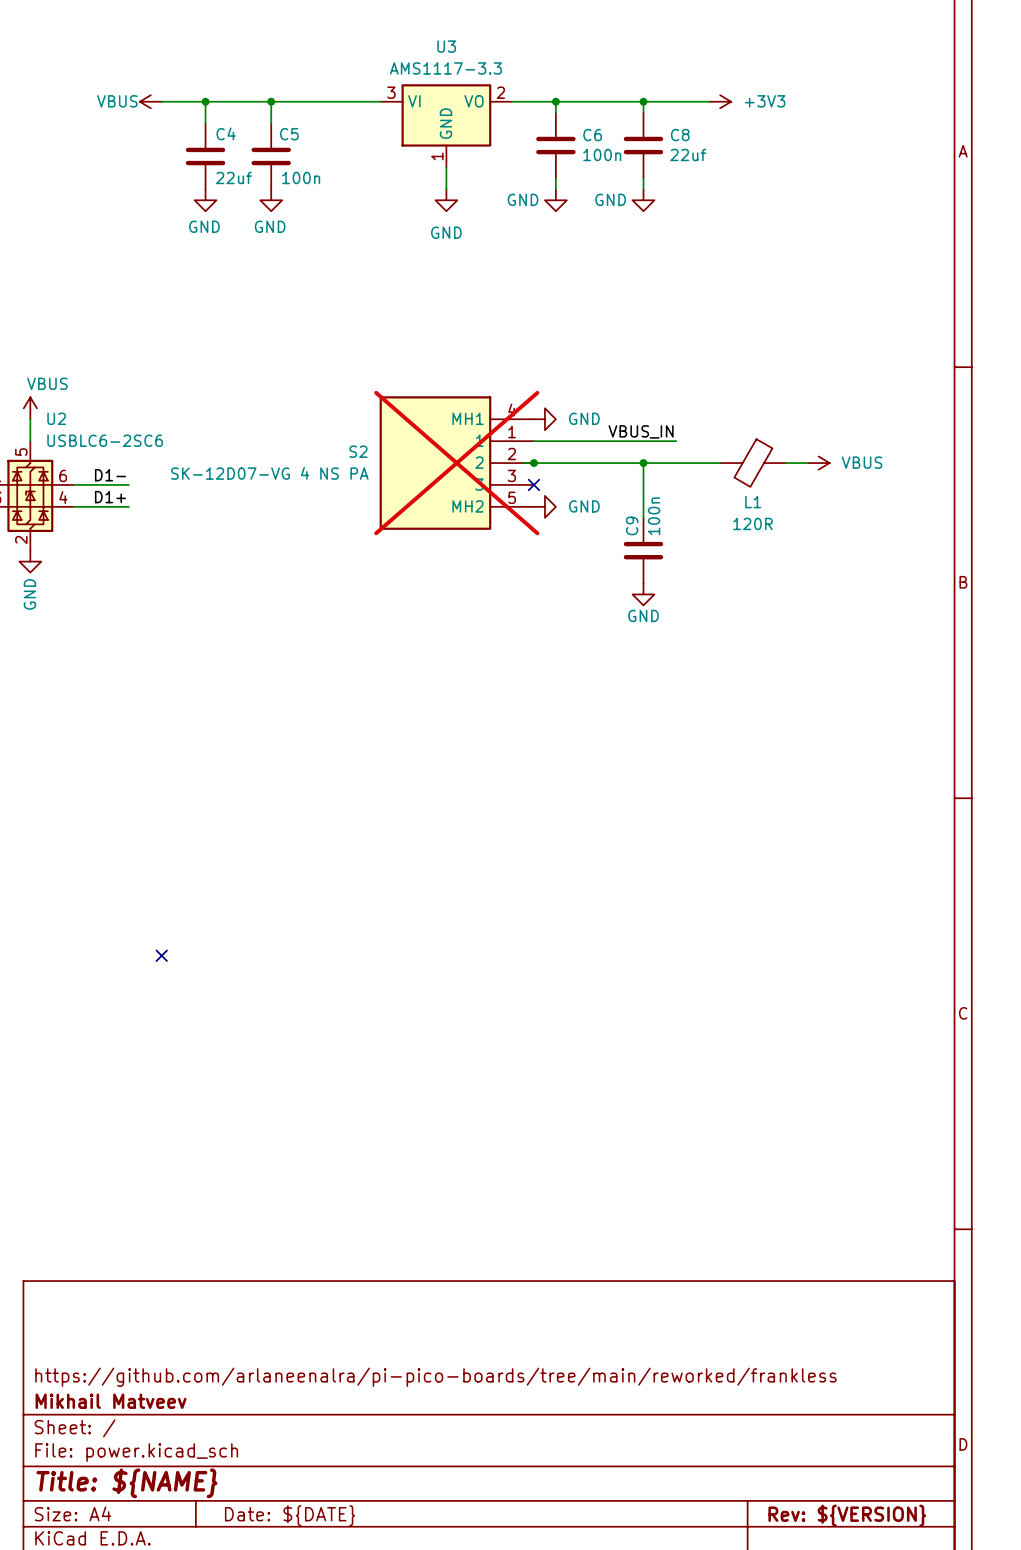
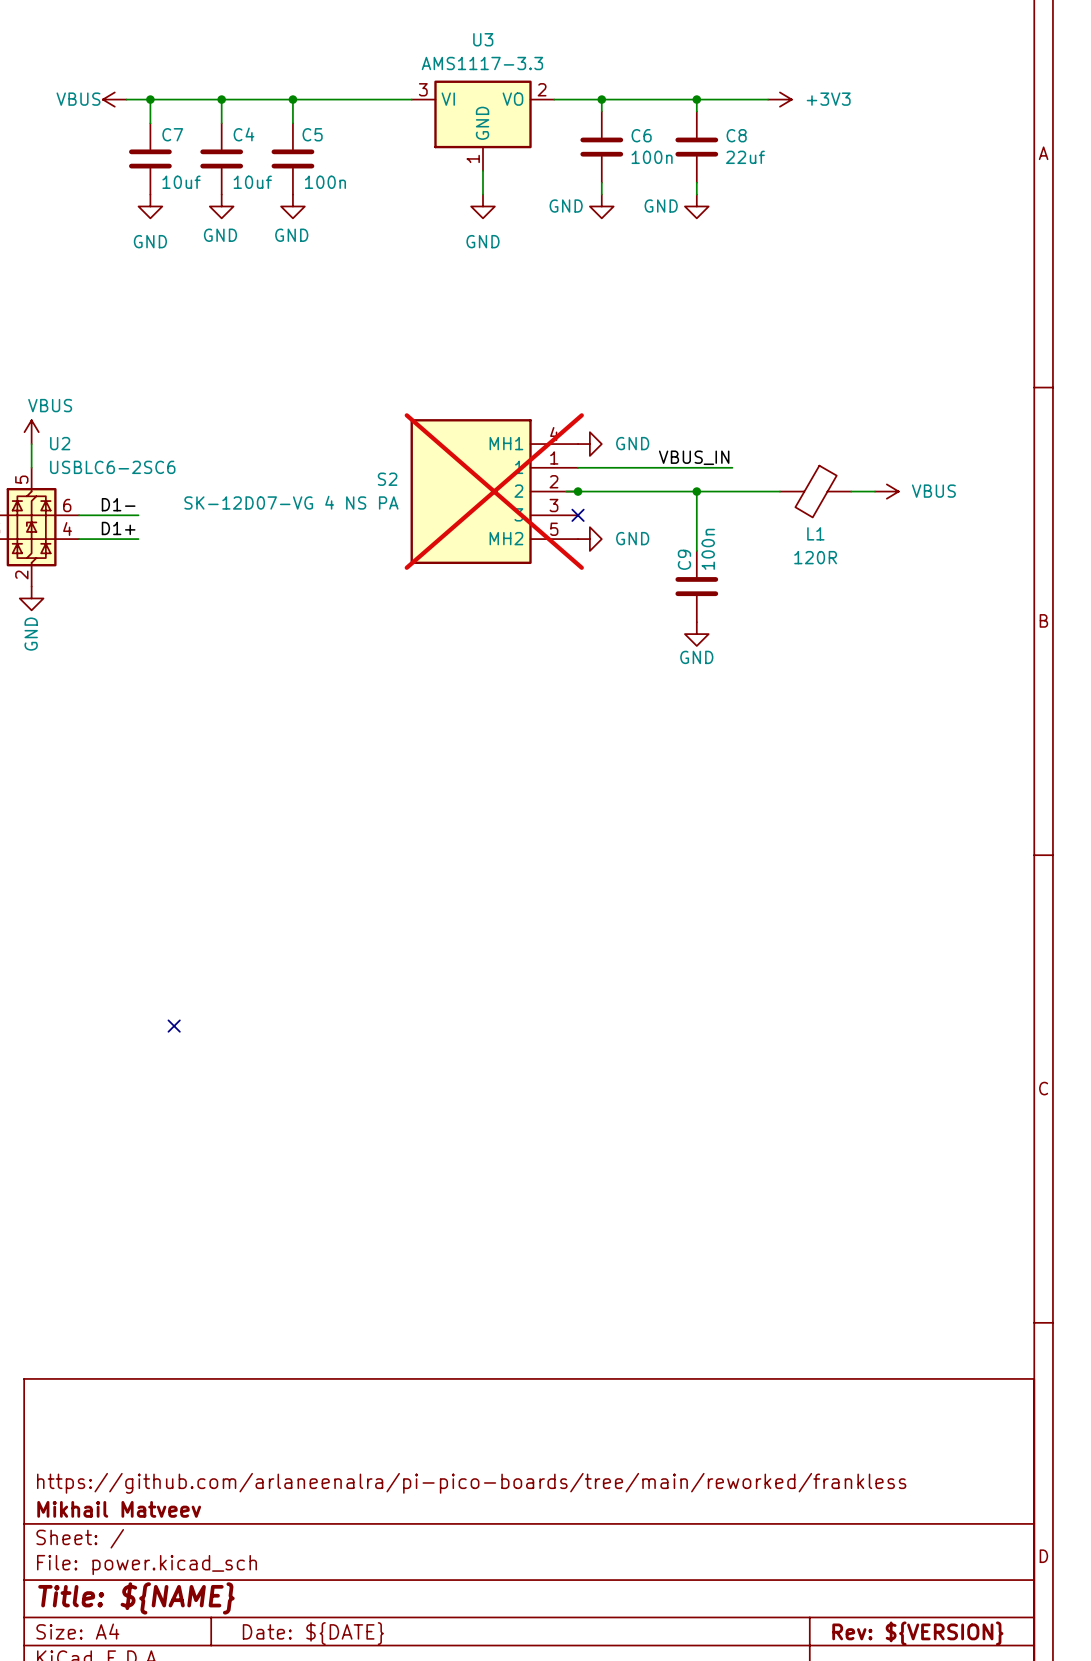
wire: none -> (150, 99) (150, 123)
junction: none -> (150, 99)
power symbol position: VBUS (150, 101) -> VBUS (114, 99)
C7: none -> 10uf (150, 158)
C4 value: 22uf (233, 177) -> 10uf (252, 182)
power symbol: none -> GND (150, 206)

